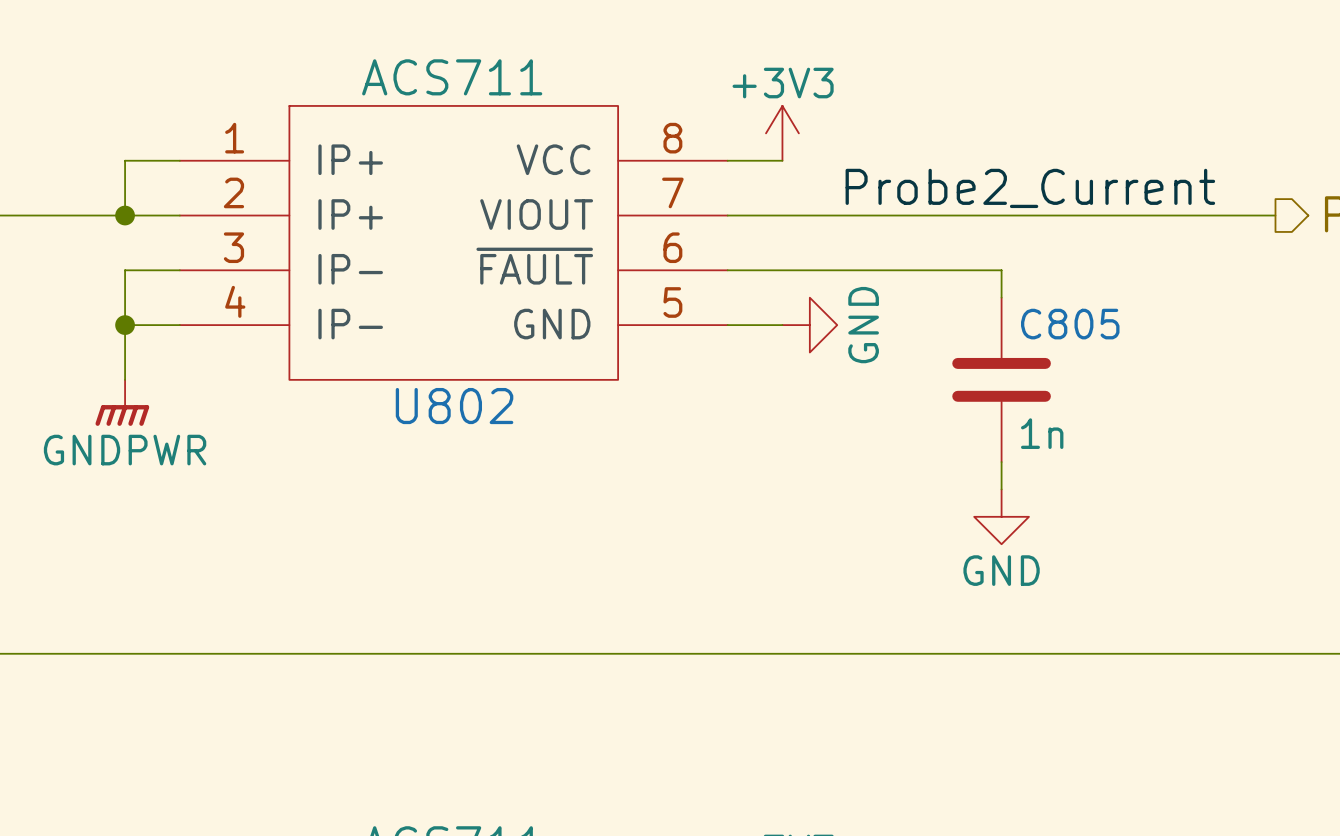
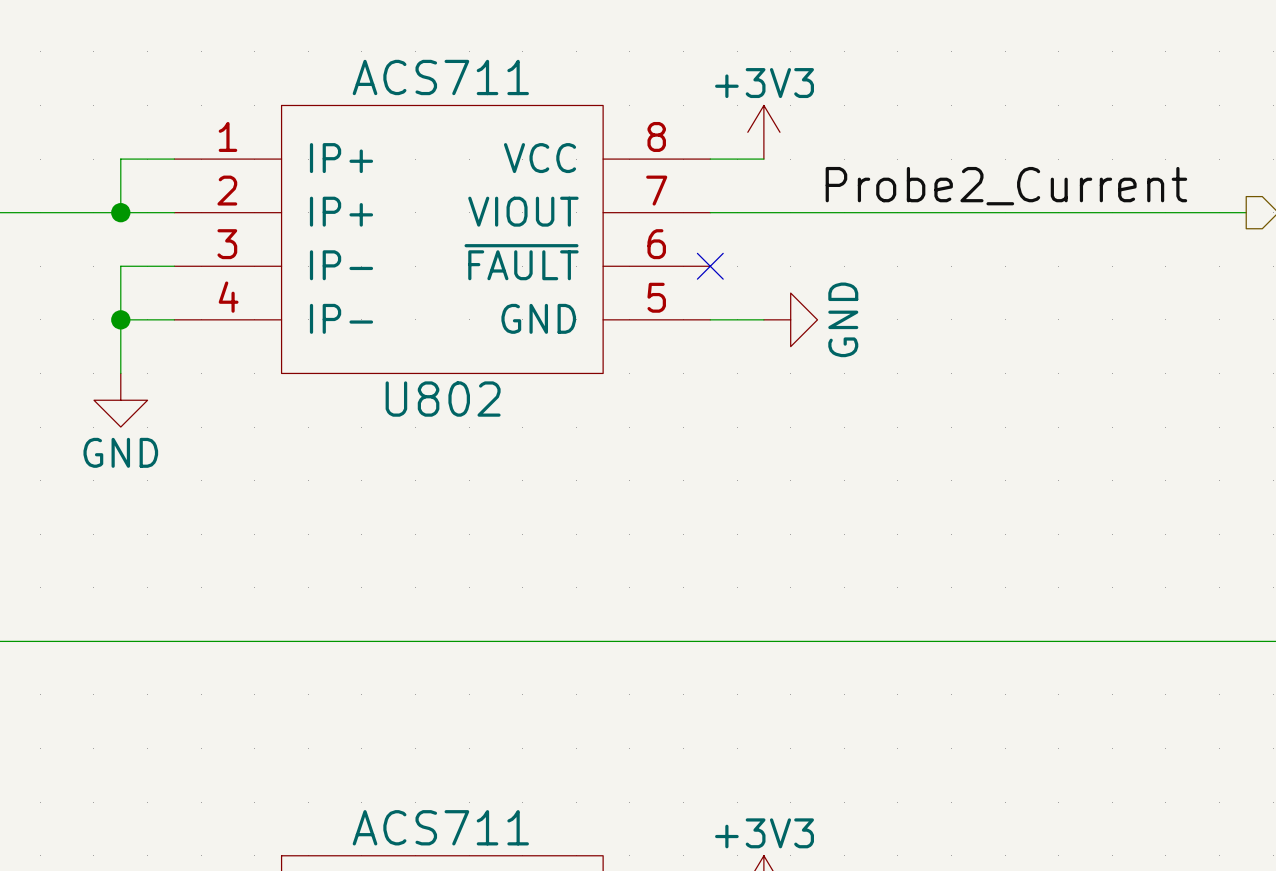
wire: (727, 270) (1001, 270) (1001, 297) -> none
no-connect mark: none -> (710, 266)
C805: 1n (1001, 379) -> none
power symbol: GNDPWR (122, 402) -> GND (120, 400)
wire: (1001, 462) (1001, 489) -> none
power symbol: GND (1001, 516) -> none

